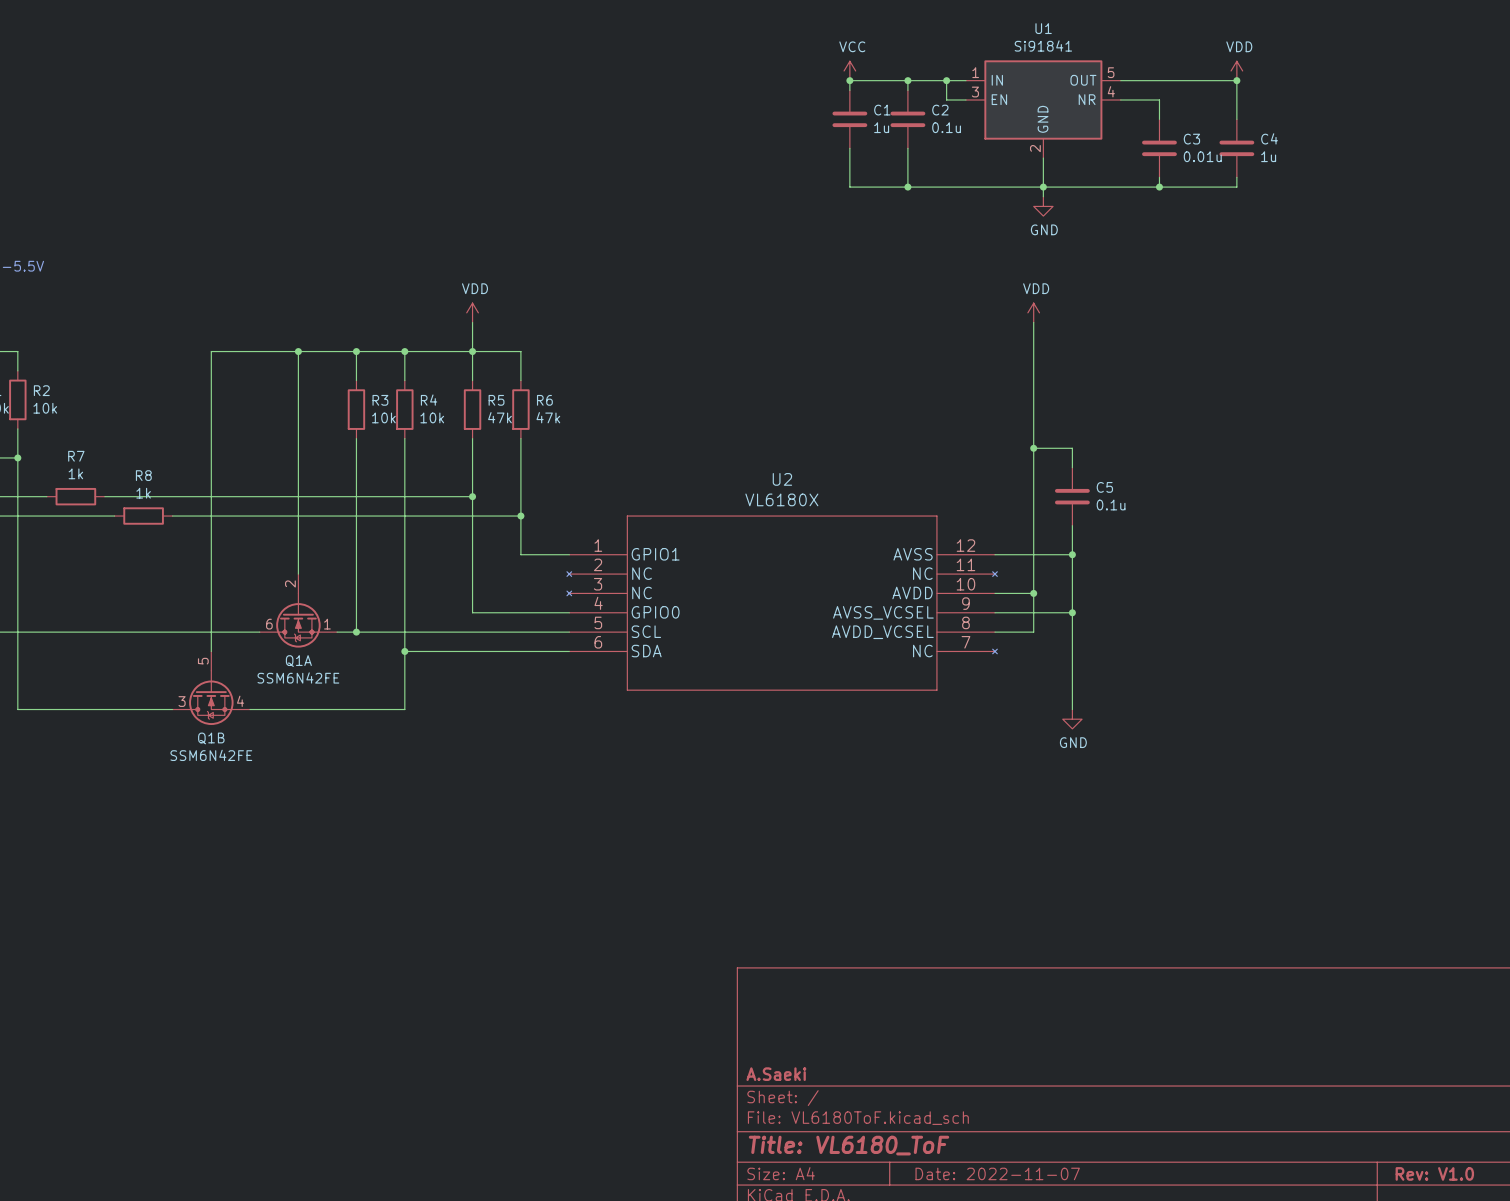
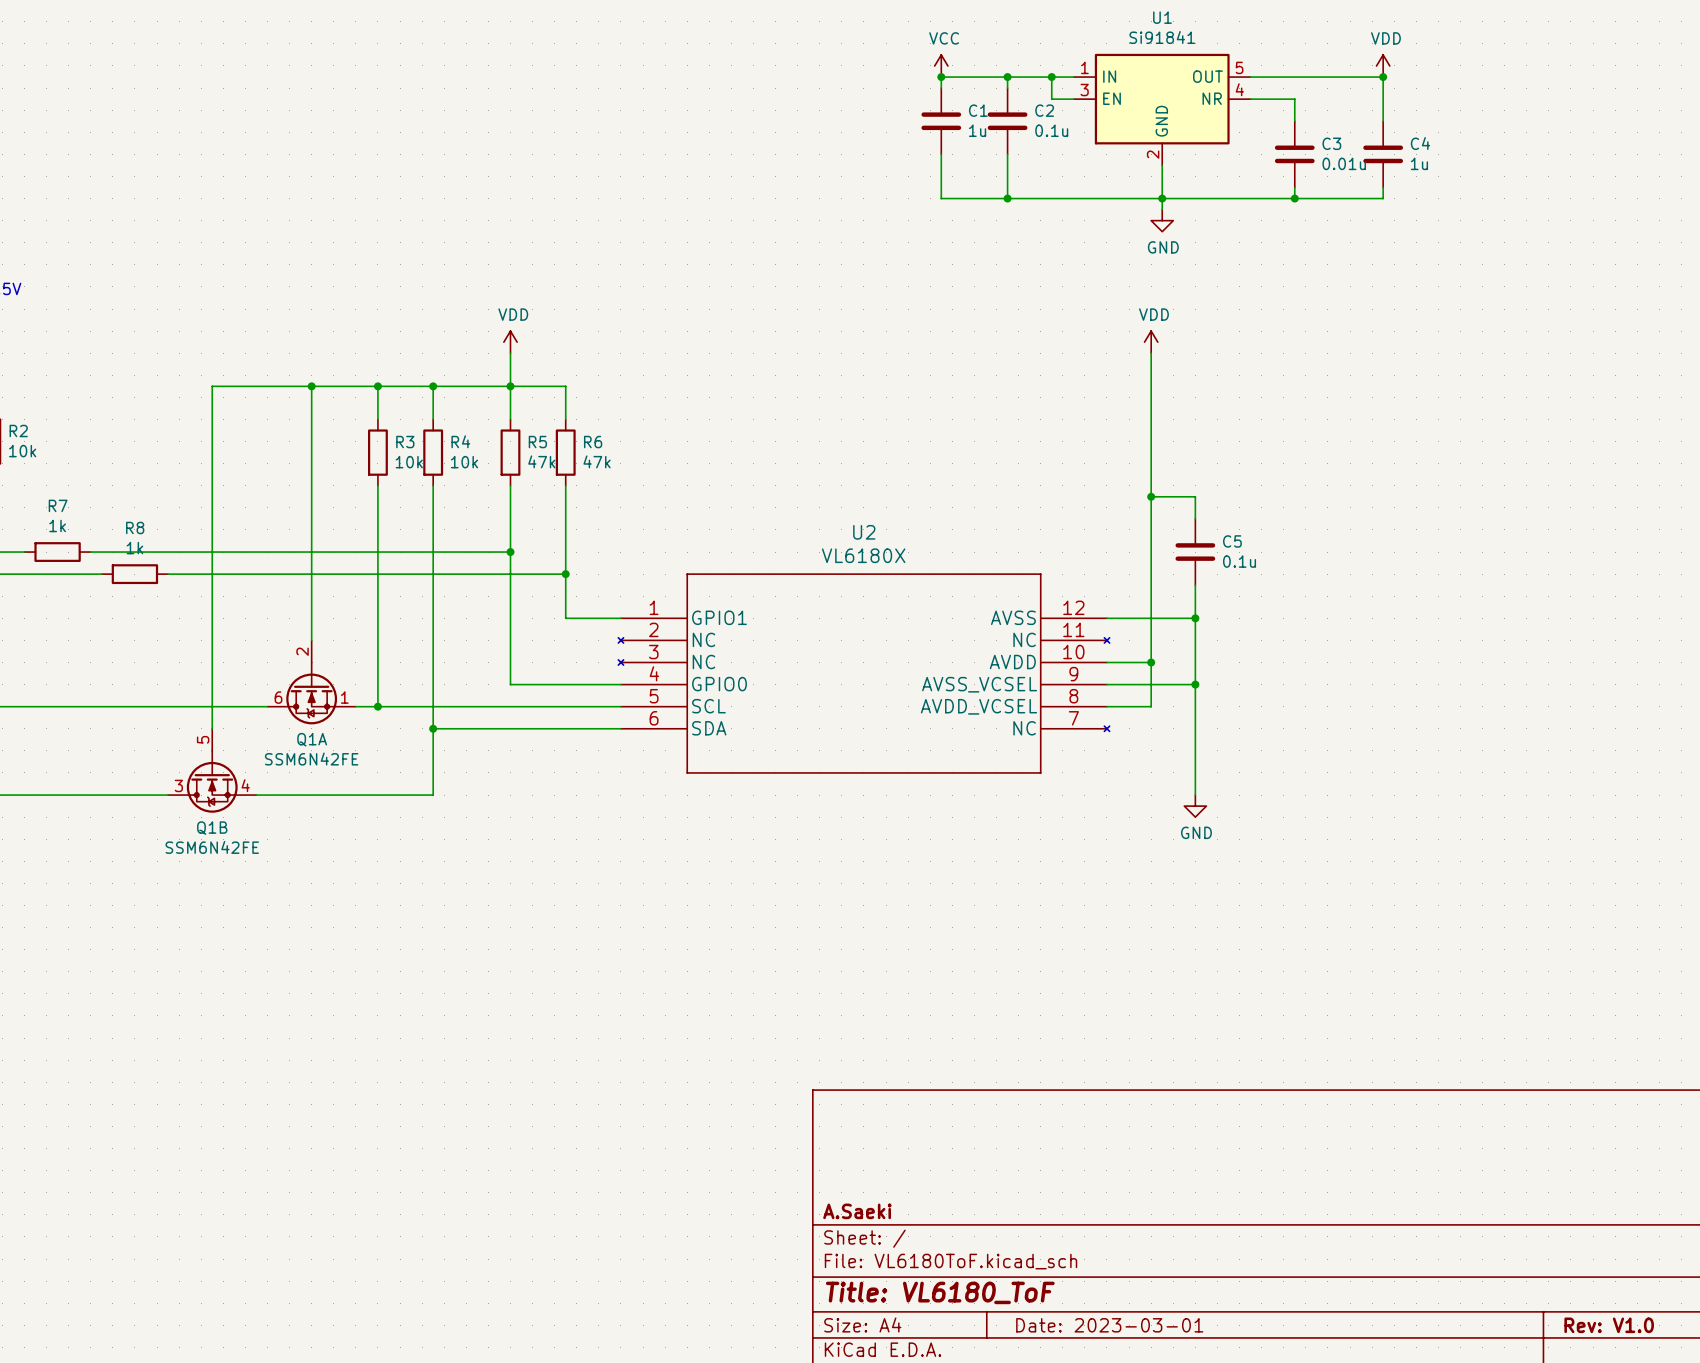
title block: Date: 2022-11-07 (997, 1173) -> Date: 2023-03-01 (1109, 1325)

